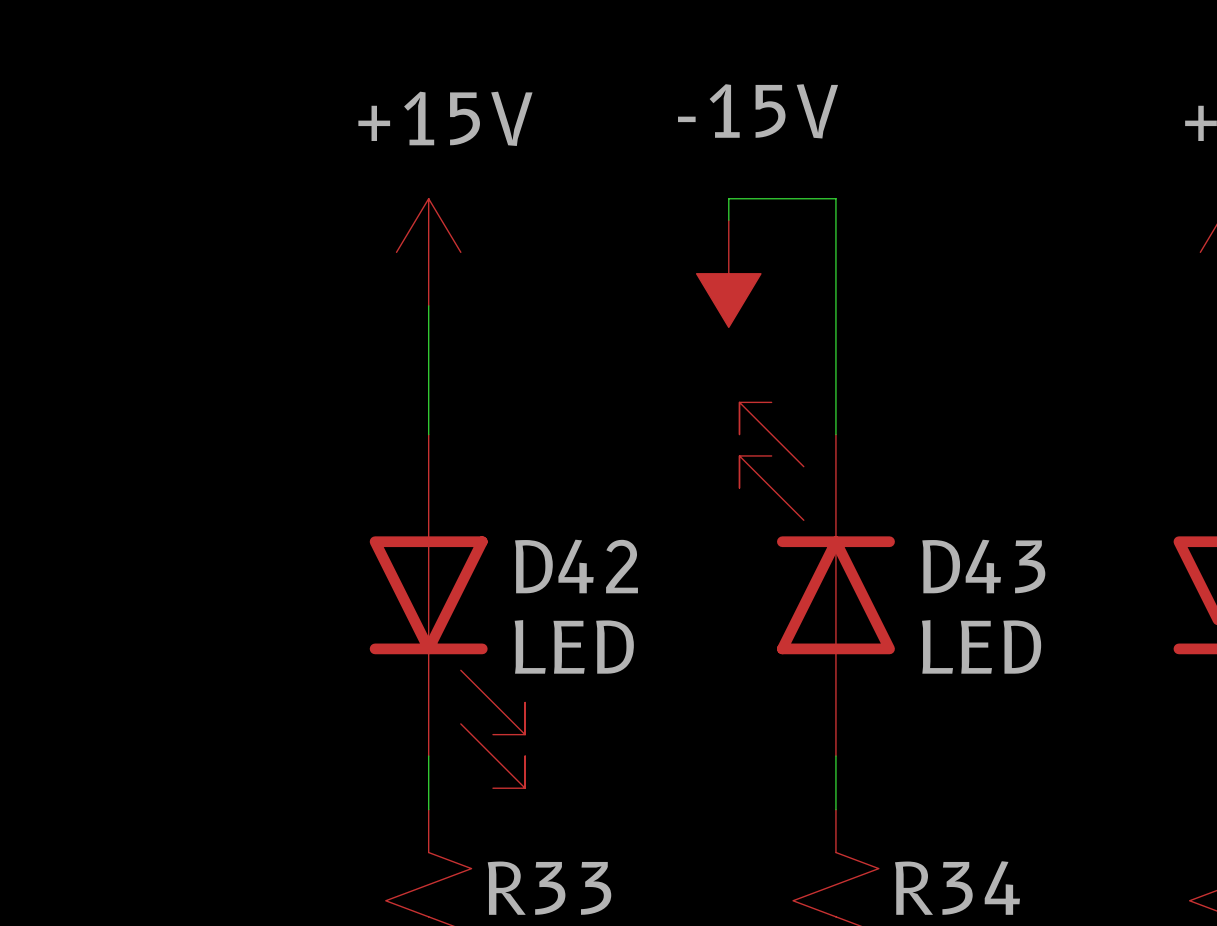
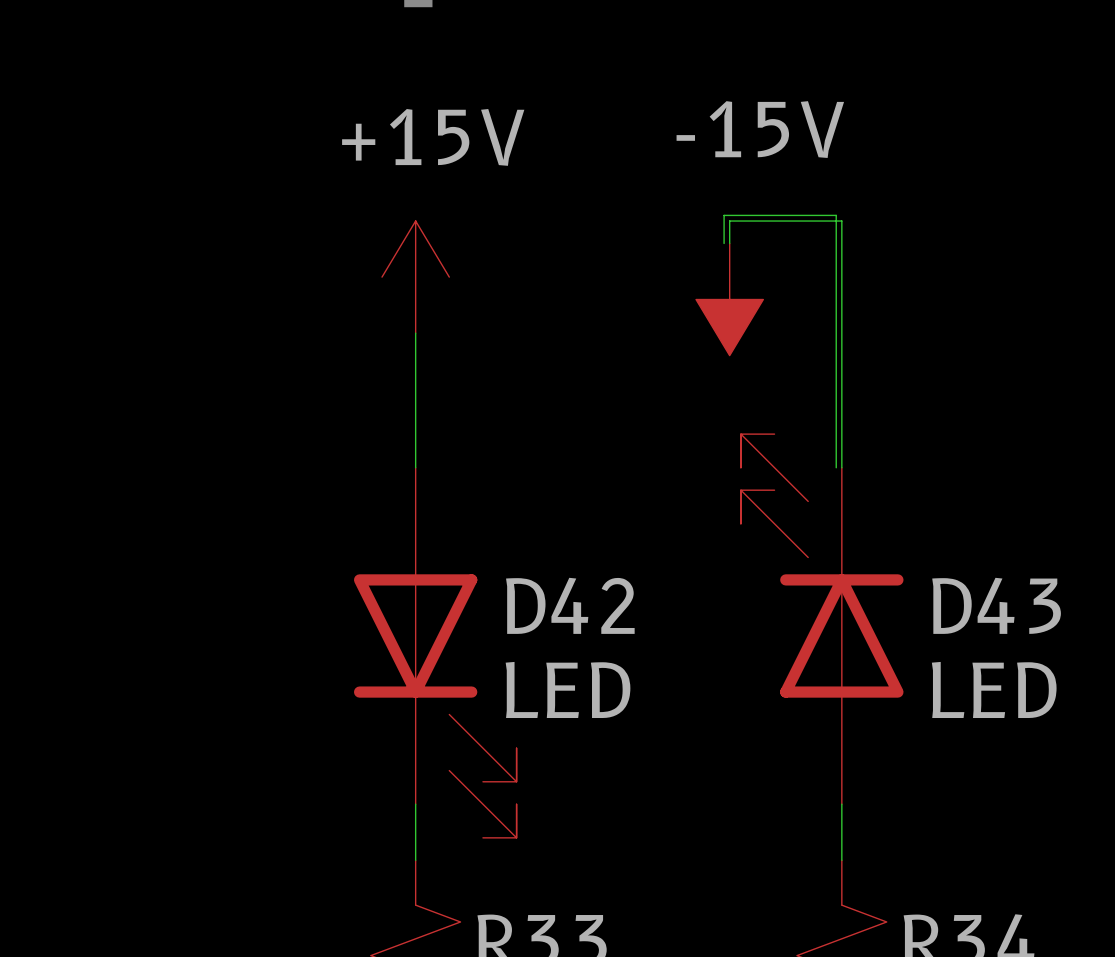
wire: none -> (724, 243) (724, 215) (836, 215) (836, 467)

